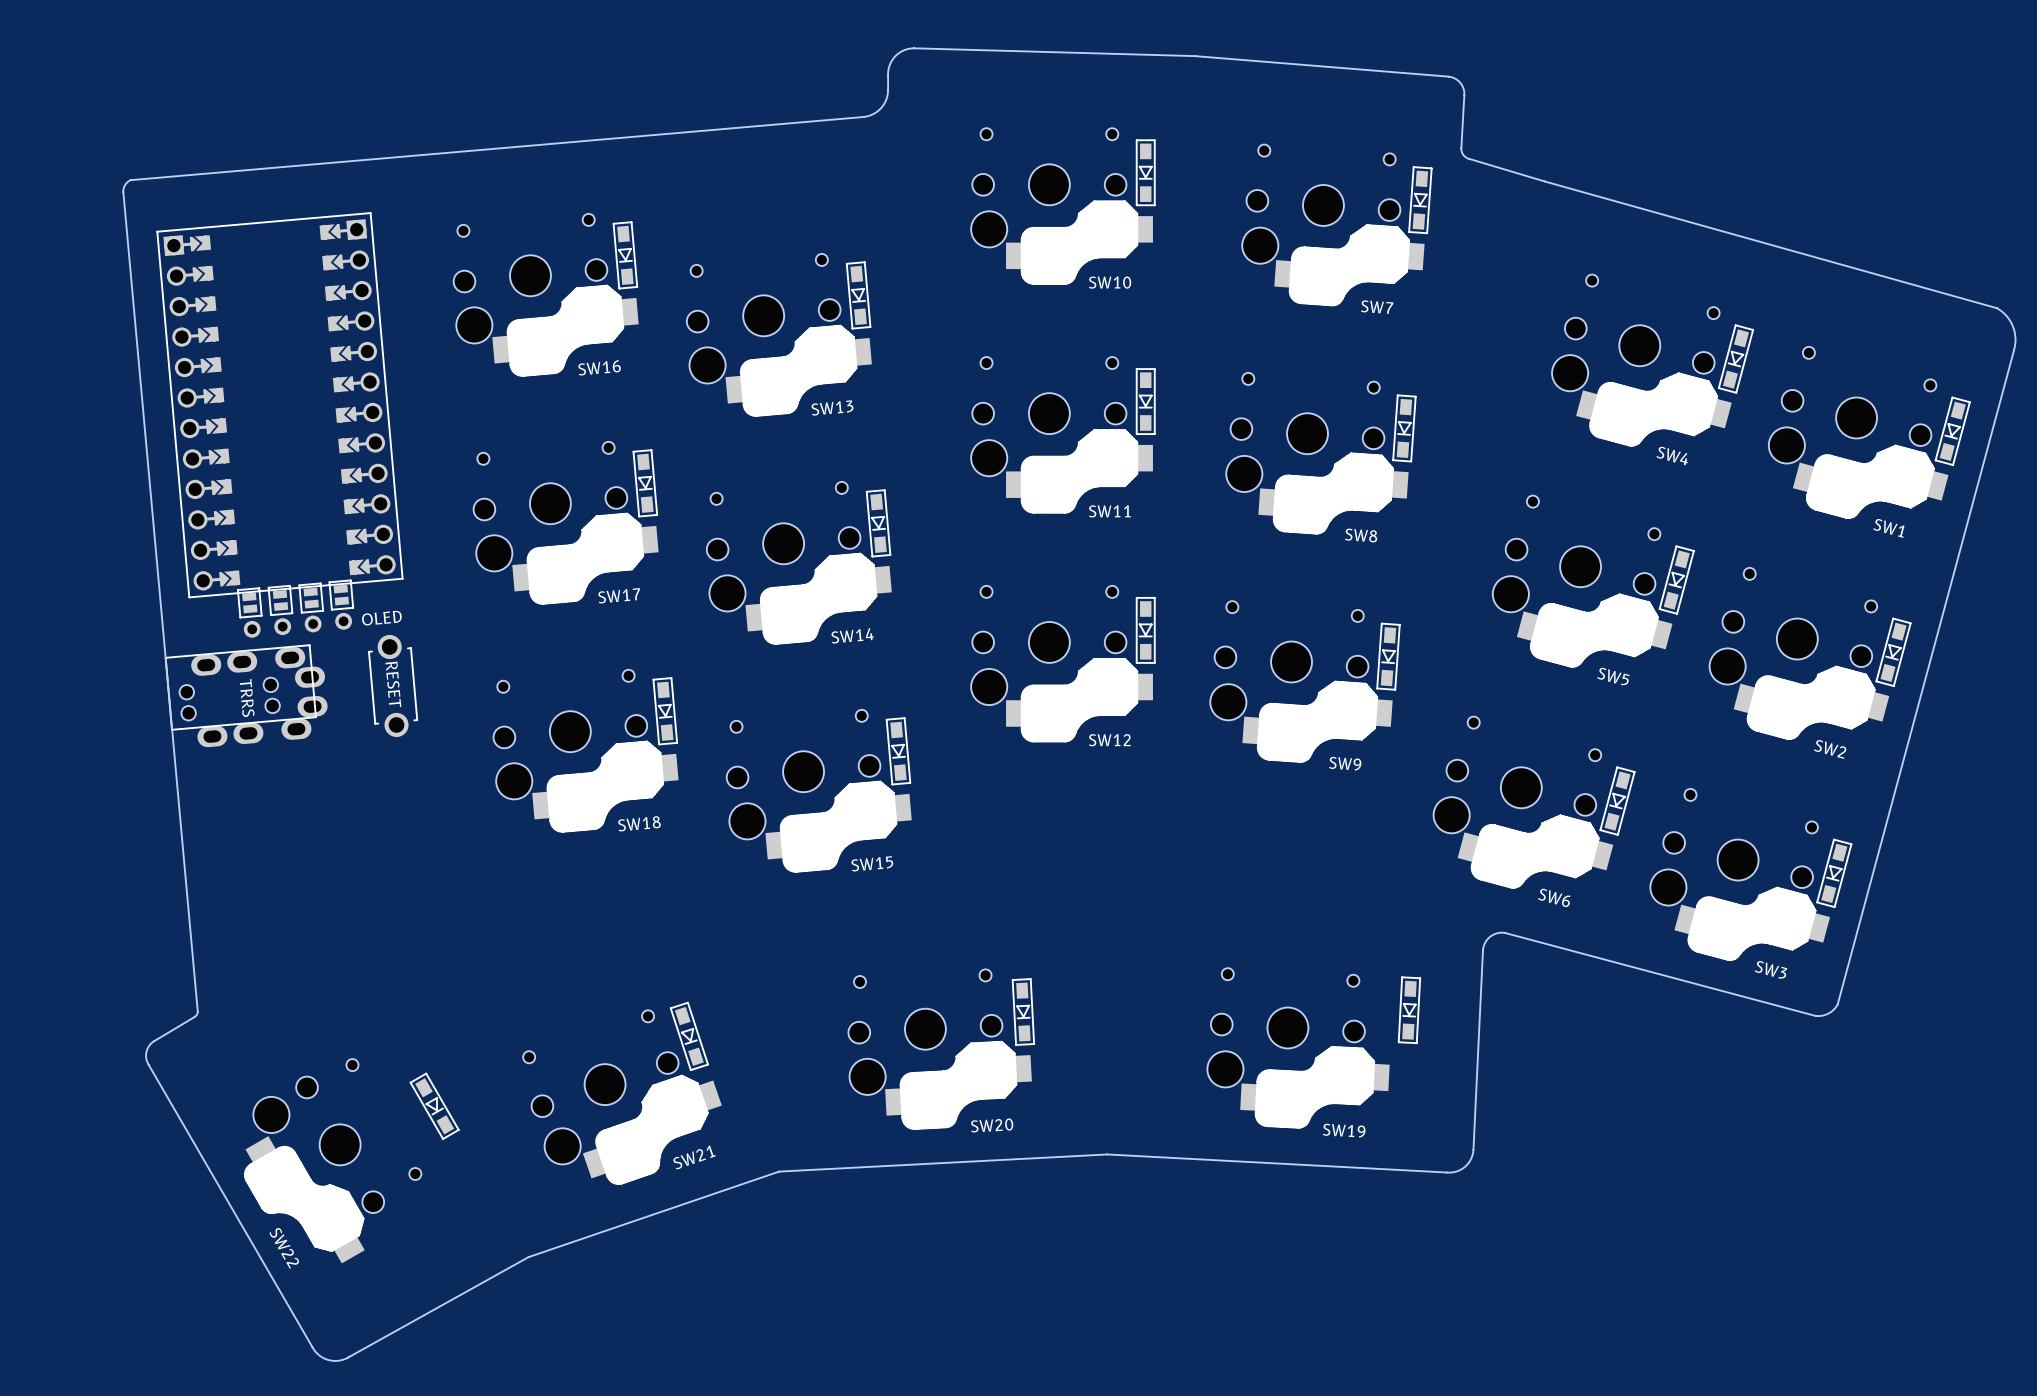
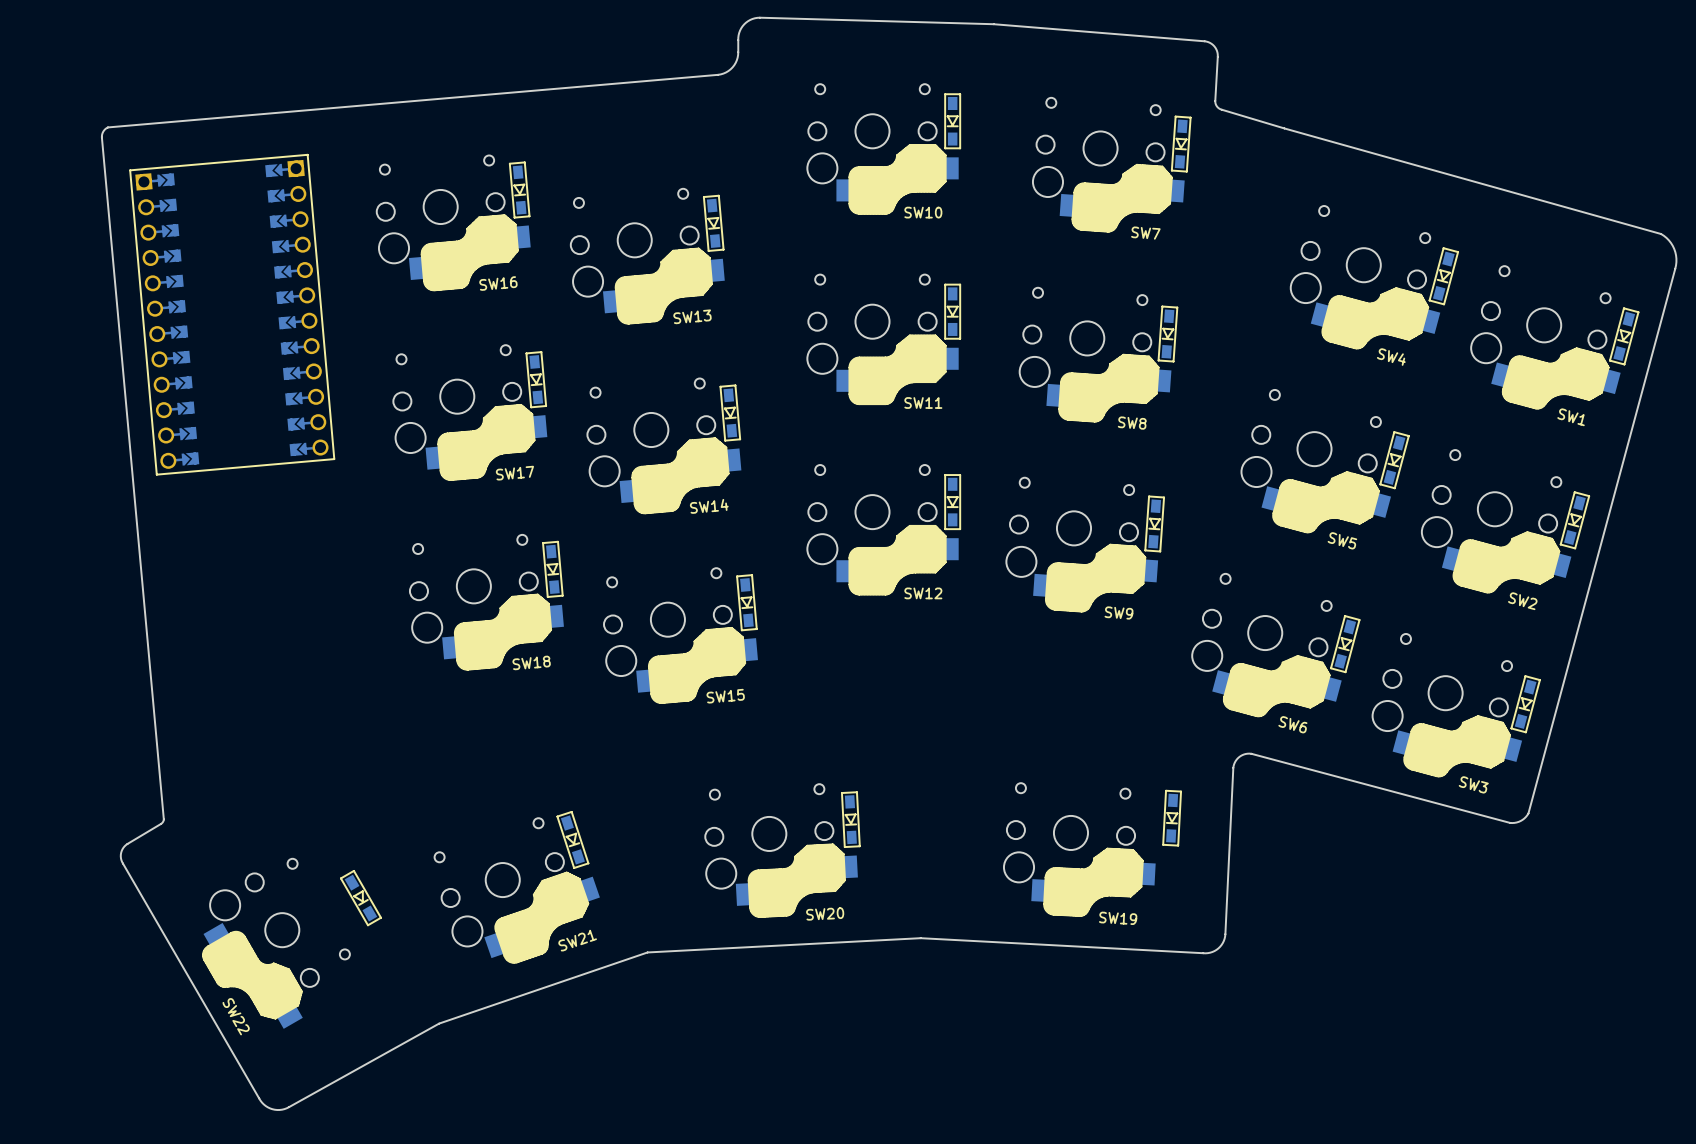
part: (341, 595) -> none
part: (311, 598) -> none
part: (280, 600) -> none
part: (249, 602) -> none
part: (297, 625) -> none
part: (393, 685) -> none
part: (246, 695) -> none

